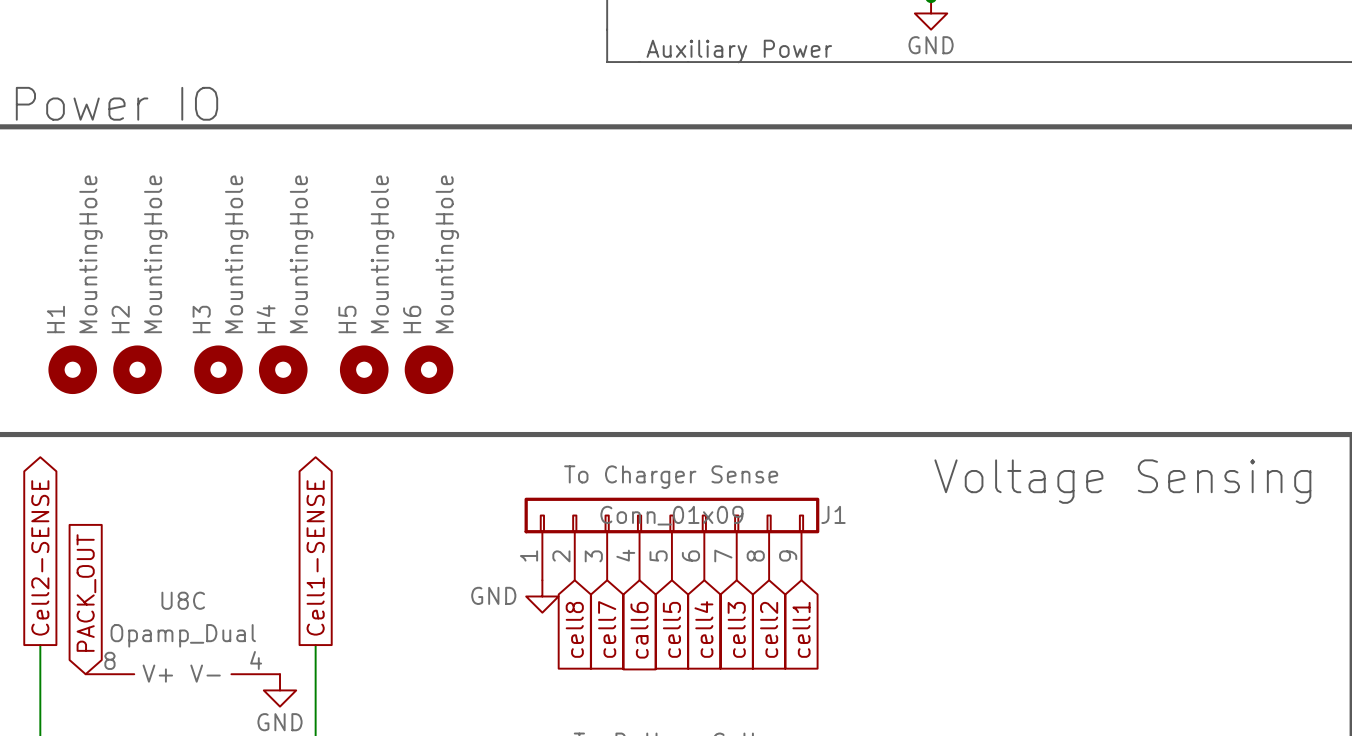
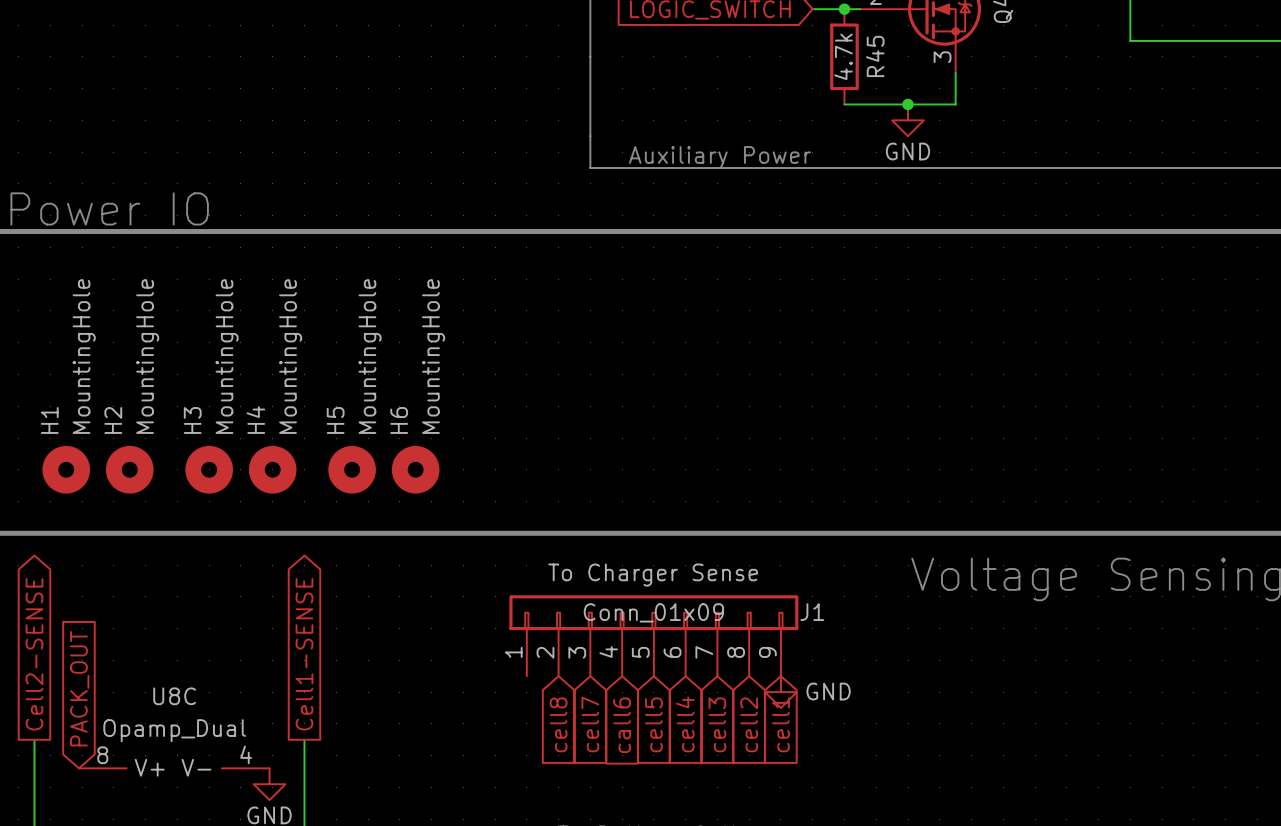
power symbol text position: GND (493, 595) -> GND (828, 691)
power symbol position: GND (542, 596) -> GND (780, 692)

